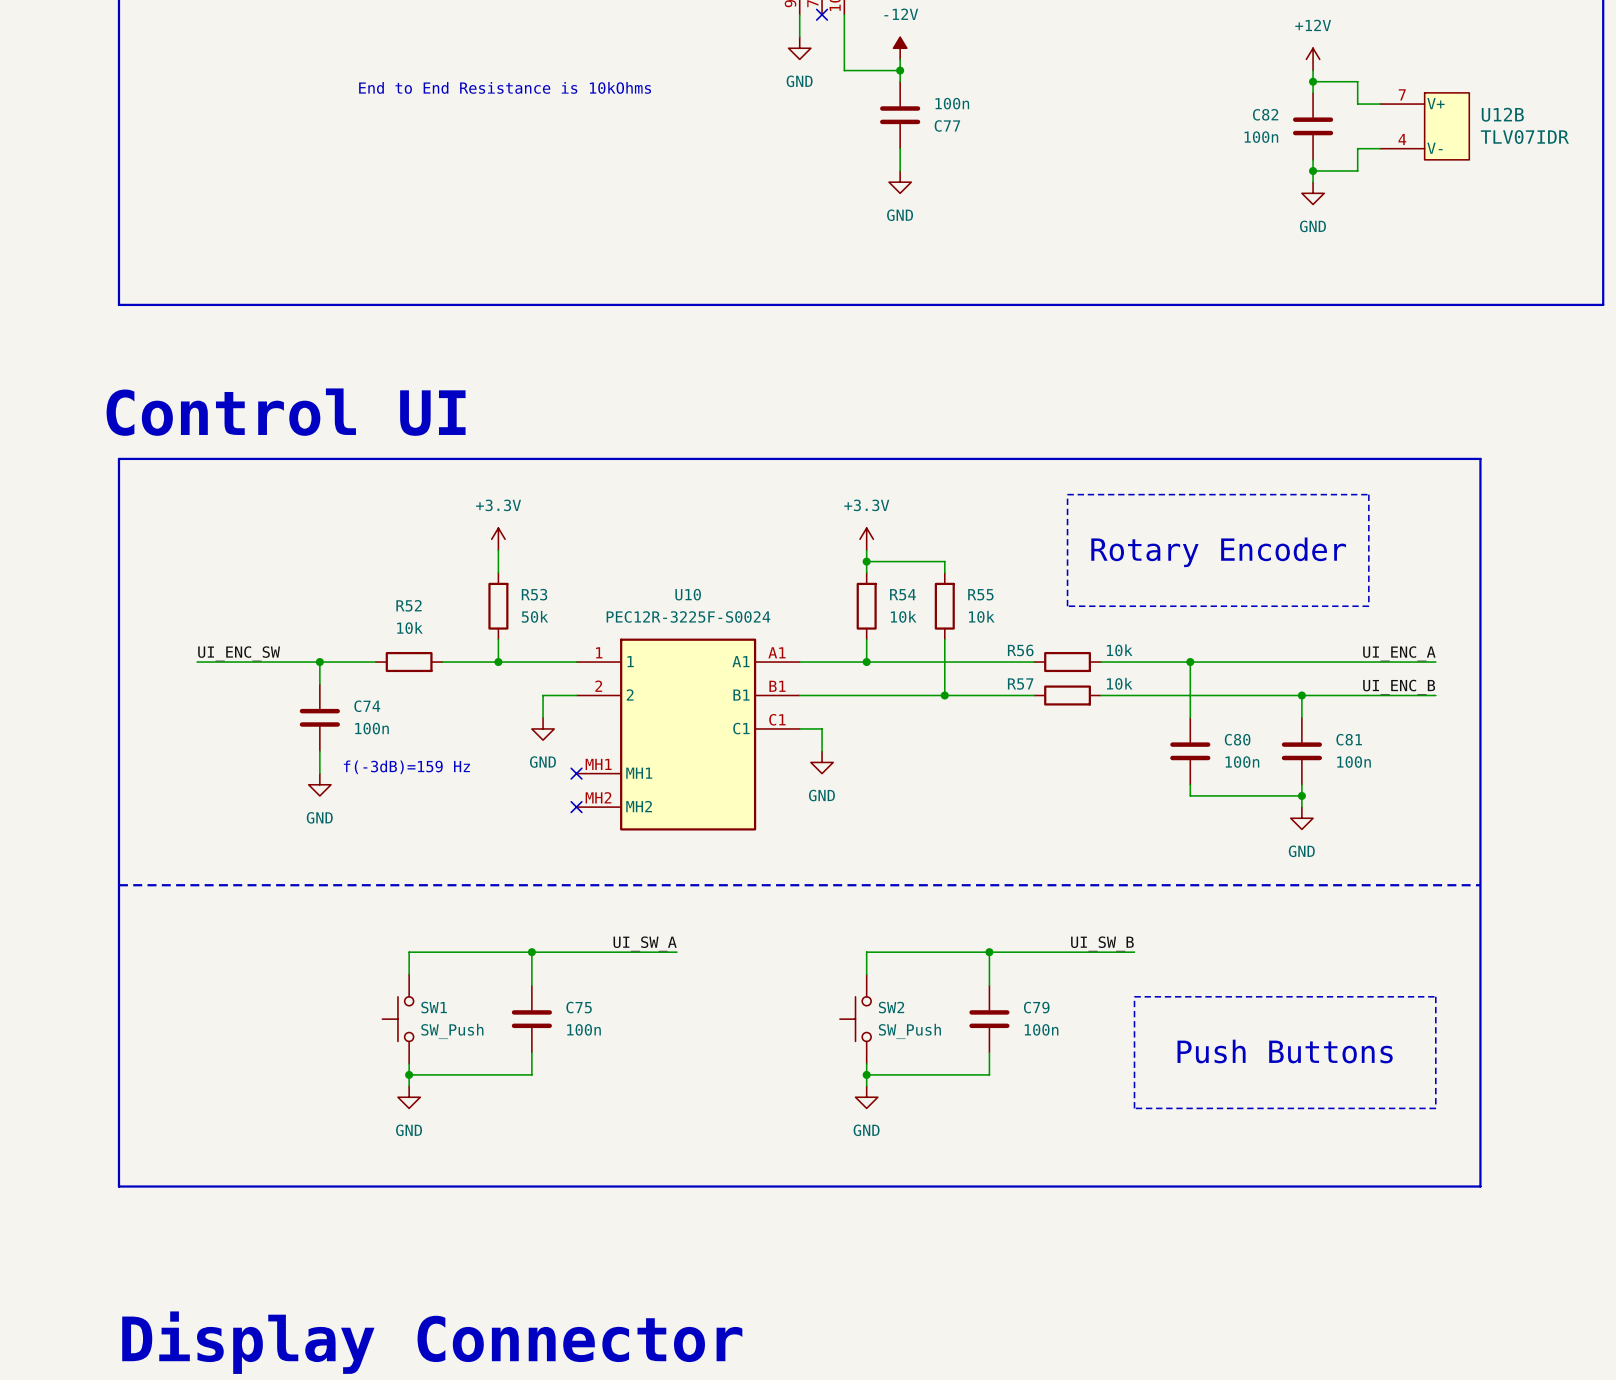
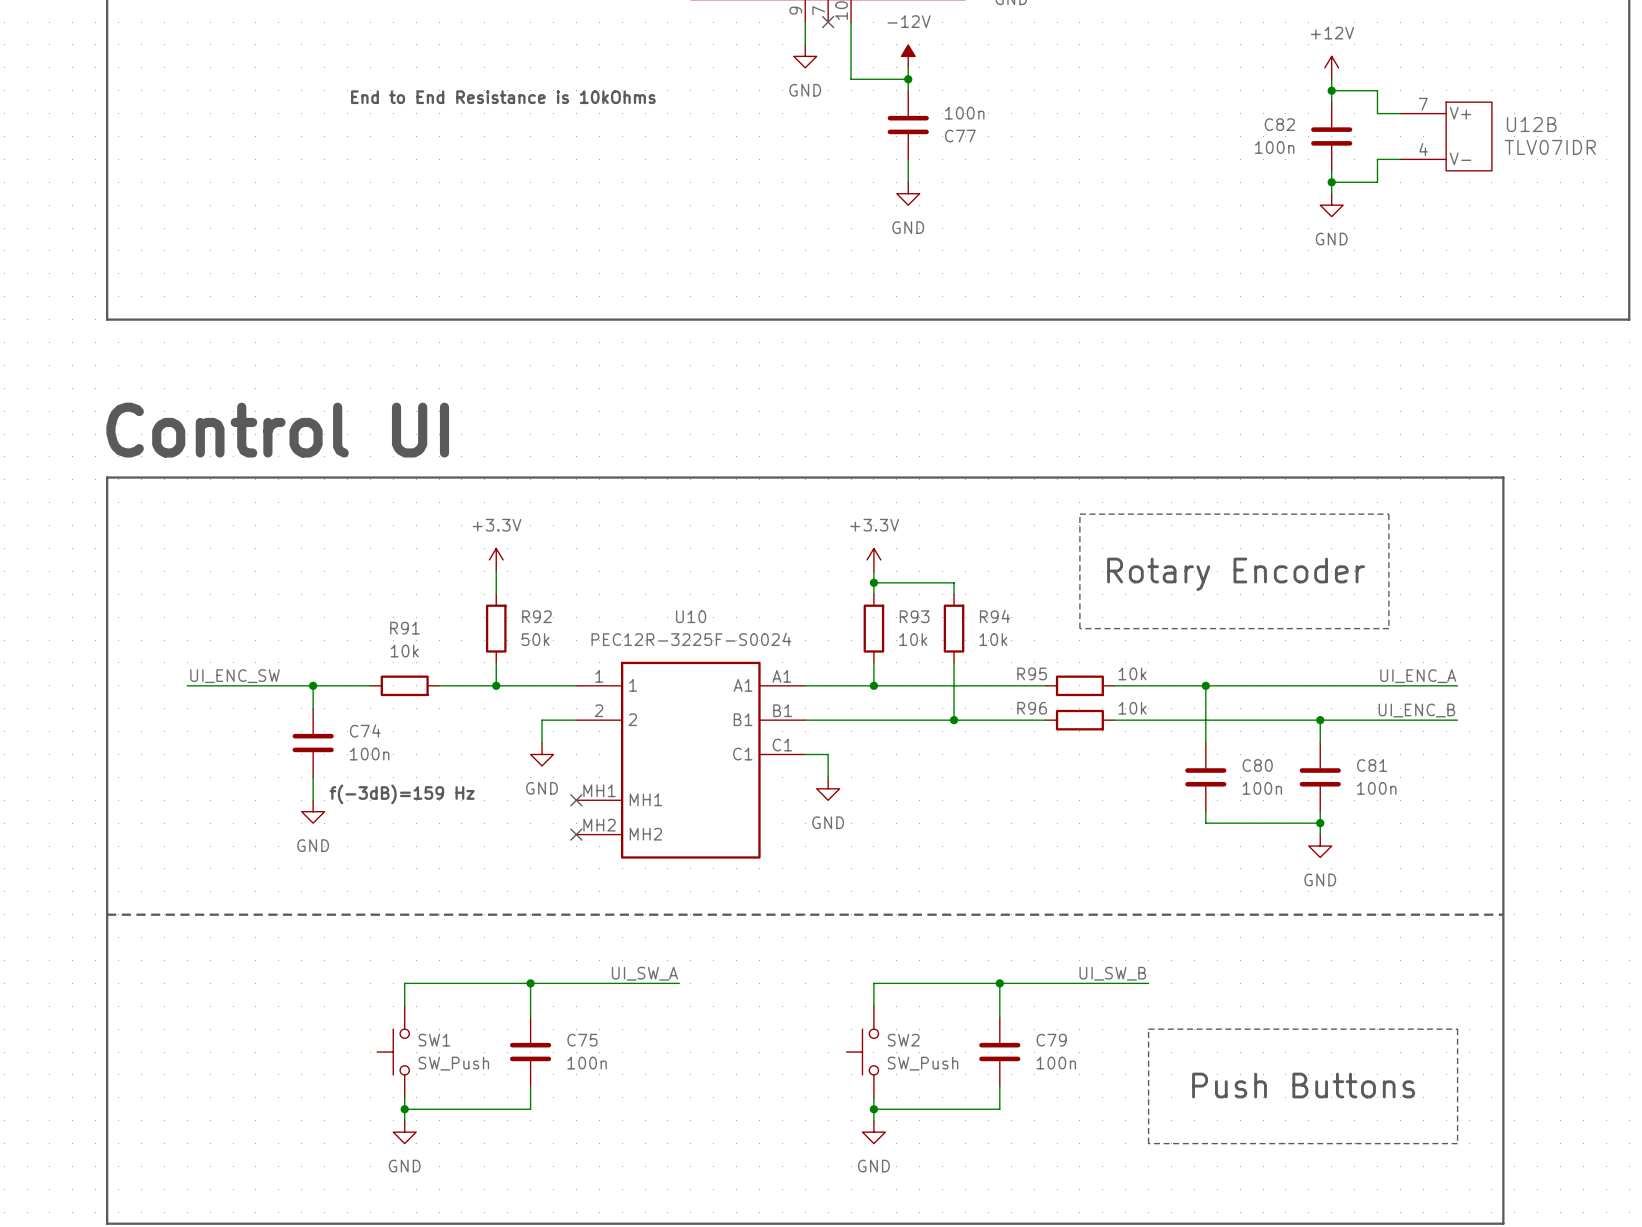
R53 name: R53 (534, 594) -> R92 (536, 616)
R54 name: R54 (902, 594) -> R93 (914, 616)
R55 name: R55 (980, 594) -> R94 (994, 616)
R52 name: R52 (409, 605) -> R91 (404, 628)
R56 name: R56 (1020, 650) -> R95 (1032, 673)
R57 name: R57 (1020, 684) -> R96 (1032, 708)

